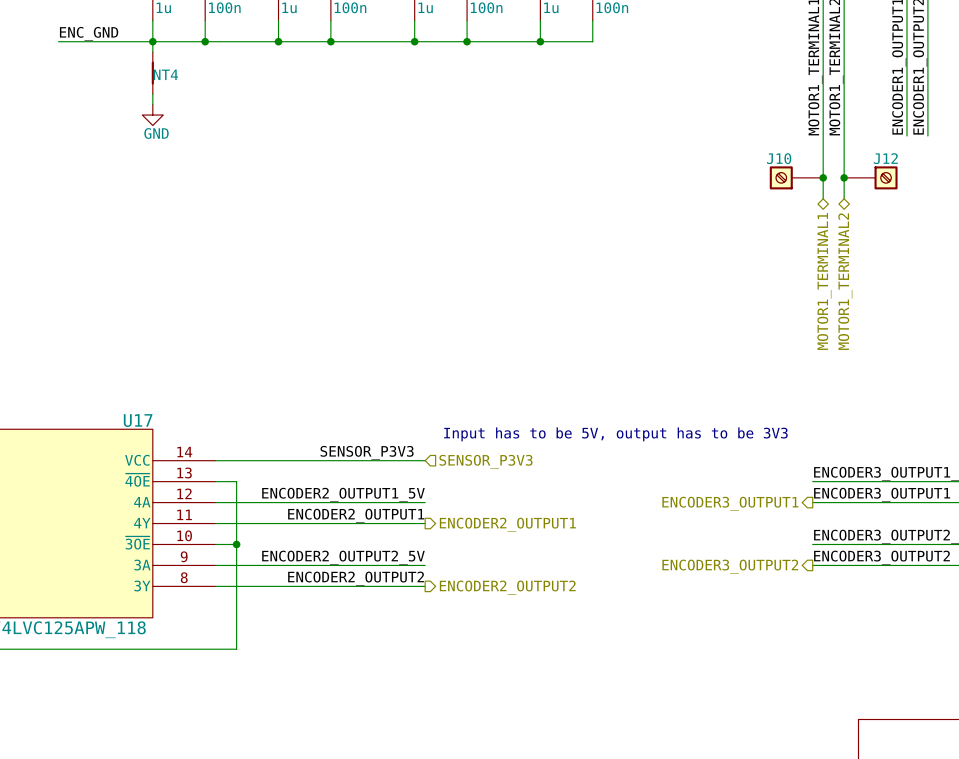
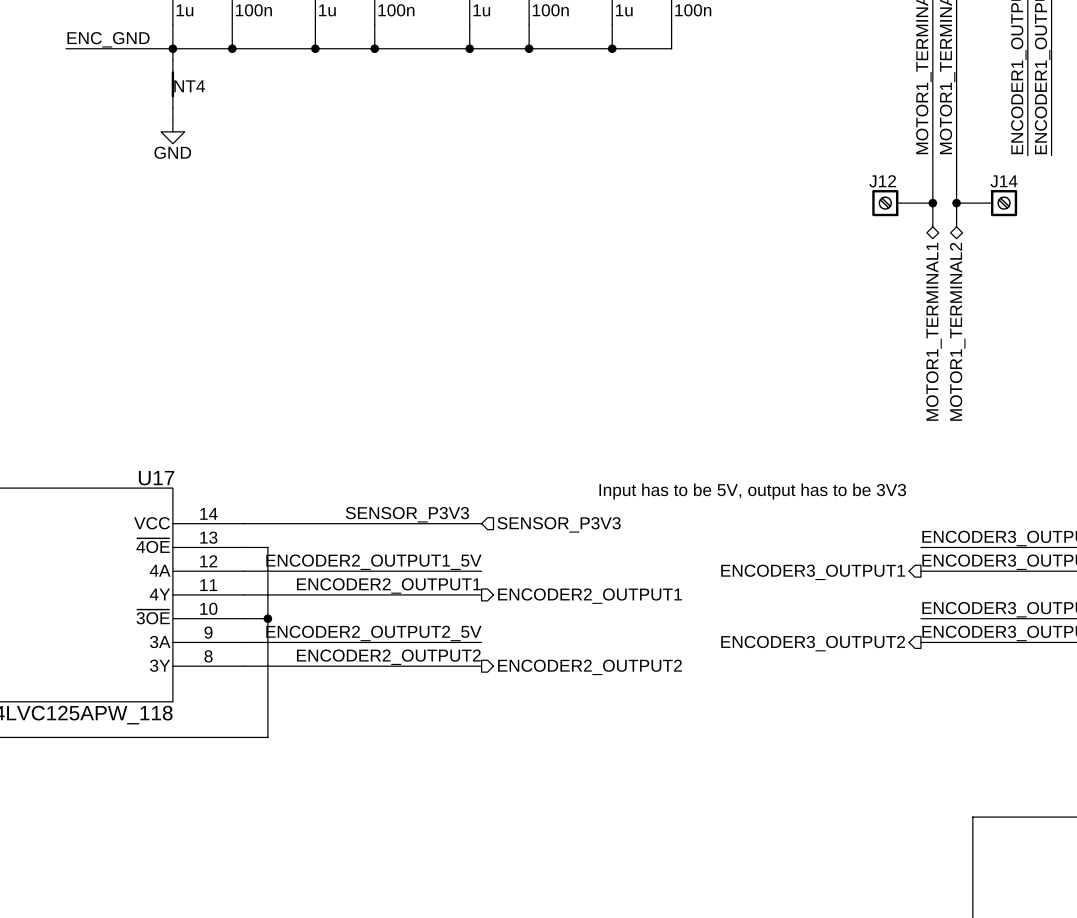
J10 name: J10 (779, 158) -> J12 (882, 181)
J12 name: J12 (885, 158) -> J14 (1003, 181)
text position: Input has to be 5V, output has to be 3V3 (615, 434) -> Input has to be 5V, output has to be 3V3 (752, 491)

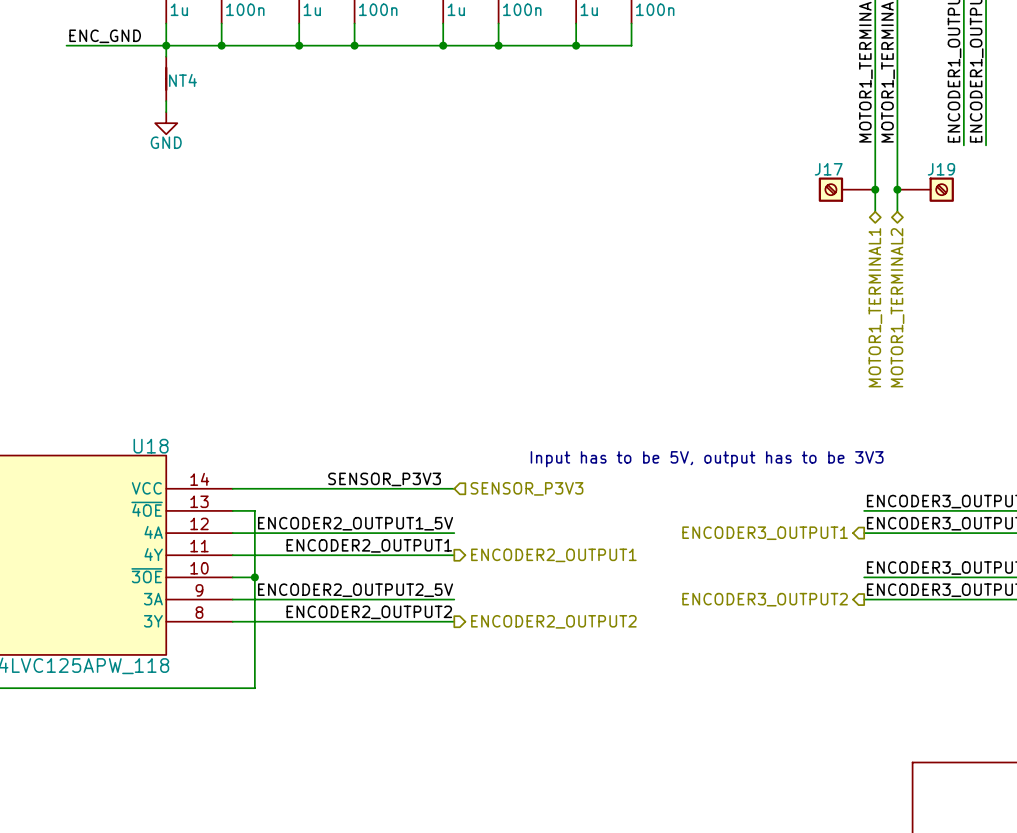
J12 name: J12 (882, 181) -> J17 (828, 169)
J14 name: J14 (1003, 181) -> J19 (941, 169)
U17 name: U17 (156, 478) -> U18 (151, 446)

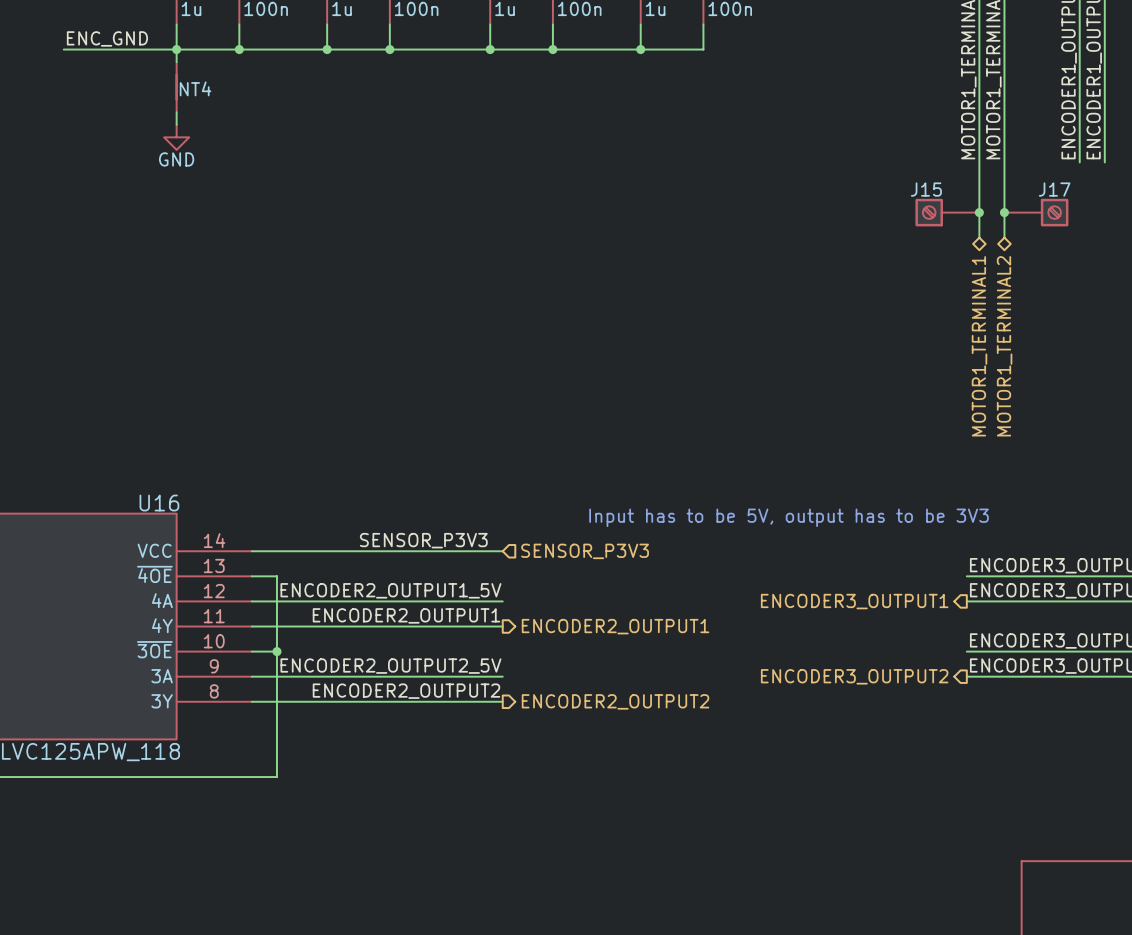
J17 name: J17 (828, 169) -> J15 (926, 189)
J19 name: J19 (941, 169) -> J17 (1054, 189)
U18 name: U18 (151, 446) -> U16 (159, 503)

